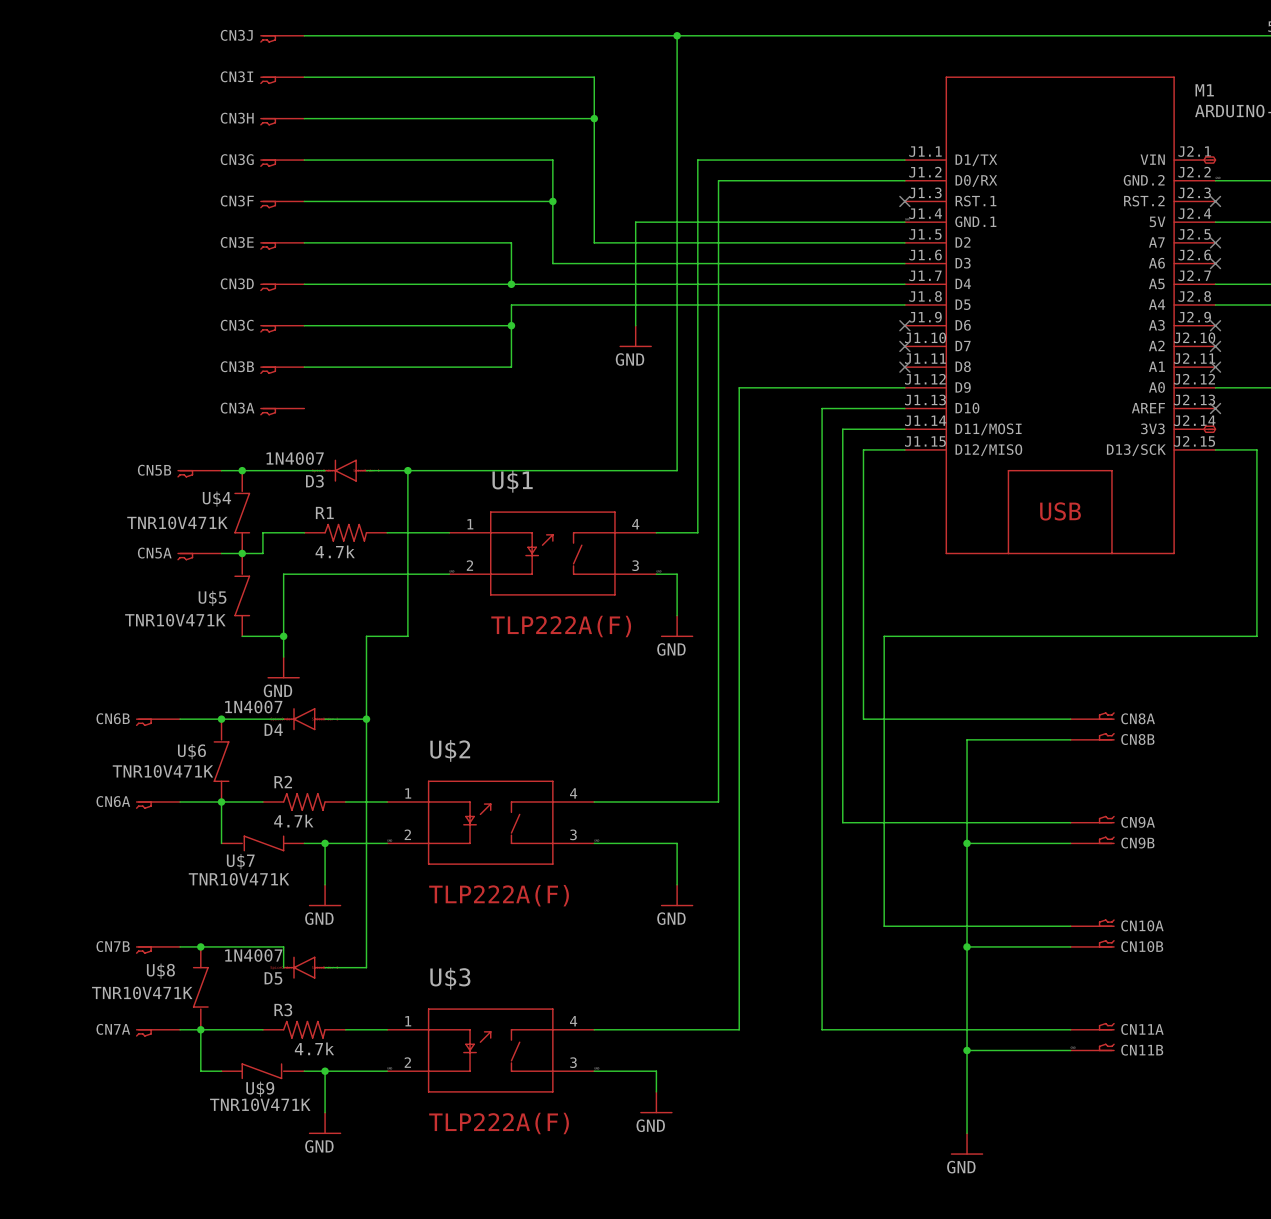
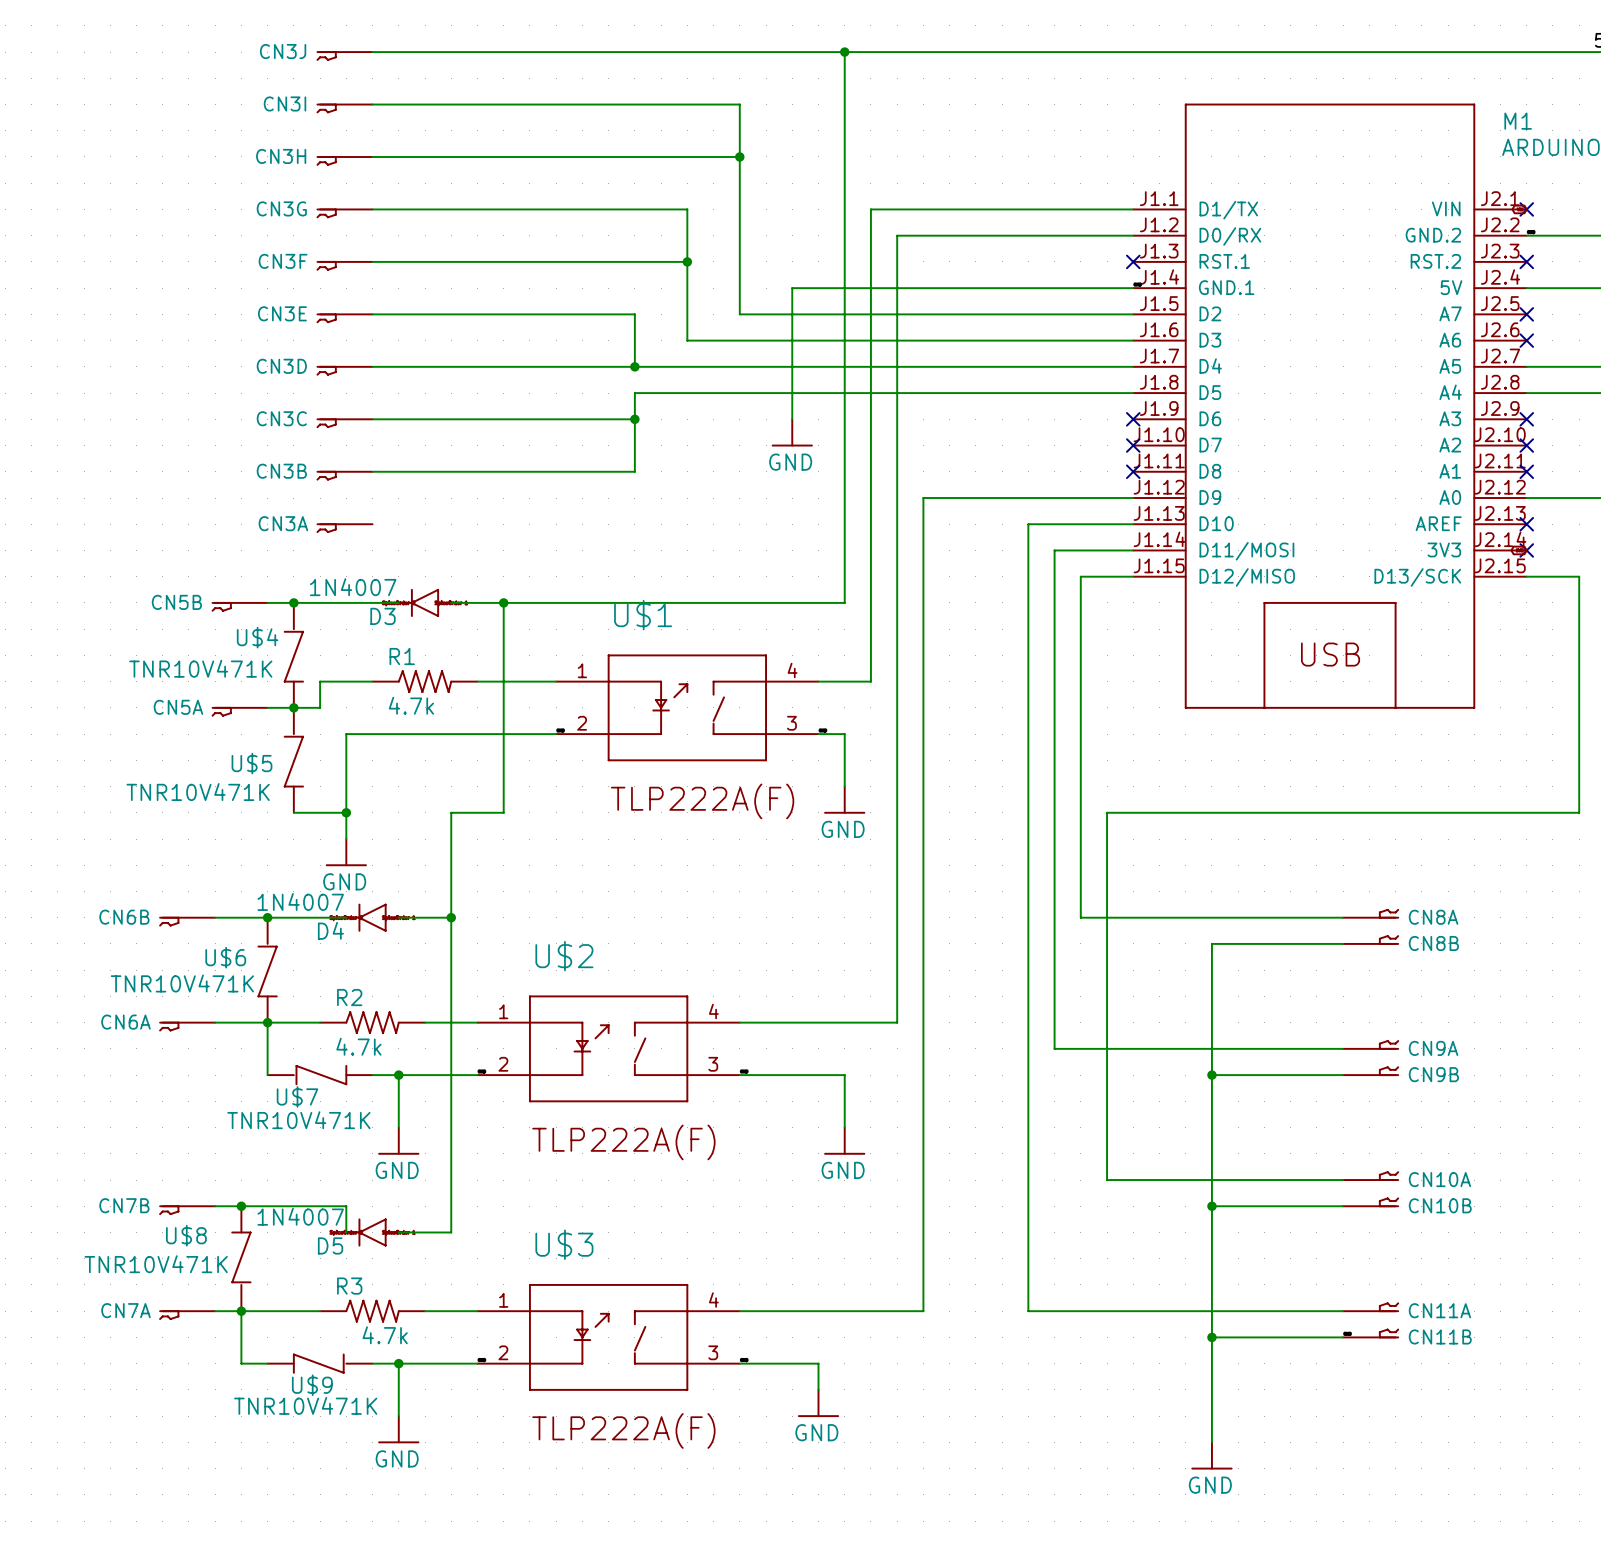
no-connect mark: none -> (1526, 209)
no-connect mark: none -> (1526, 550)

